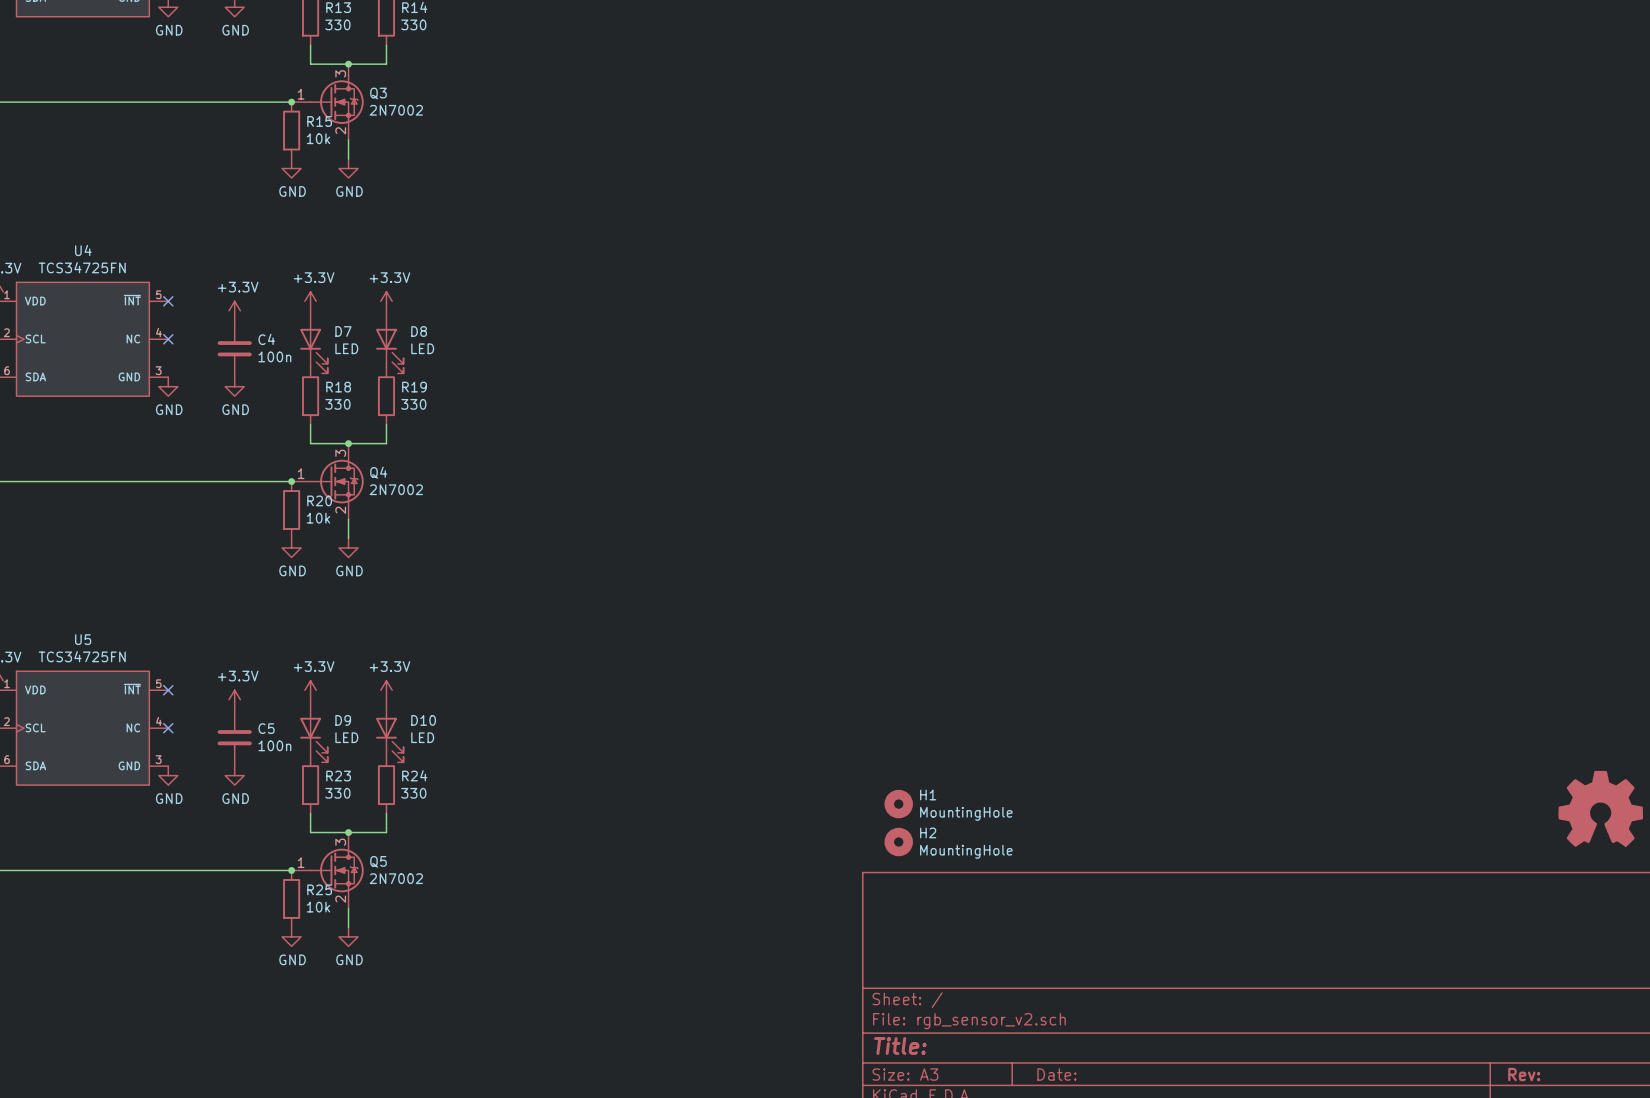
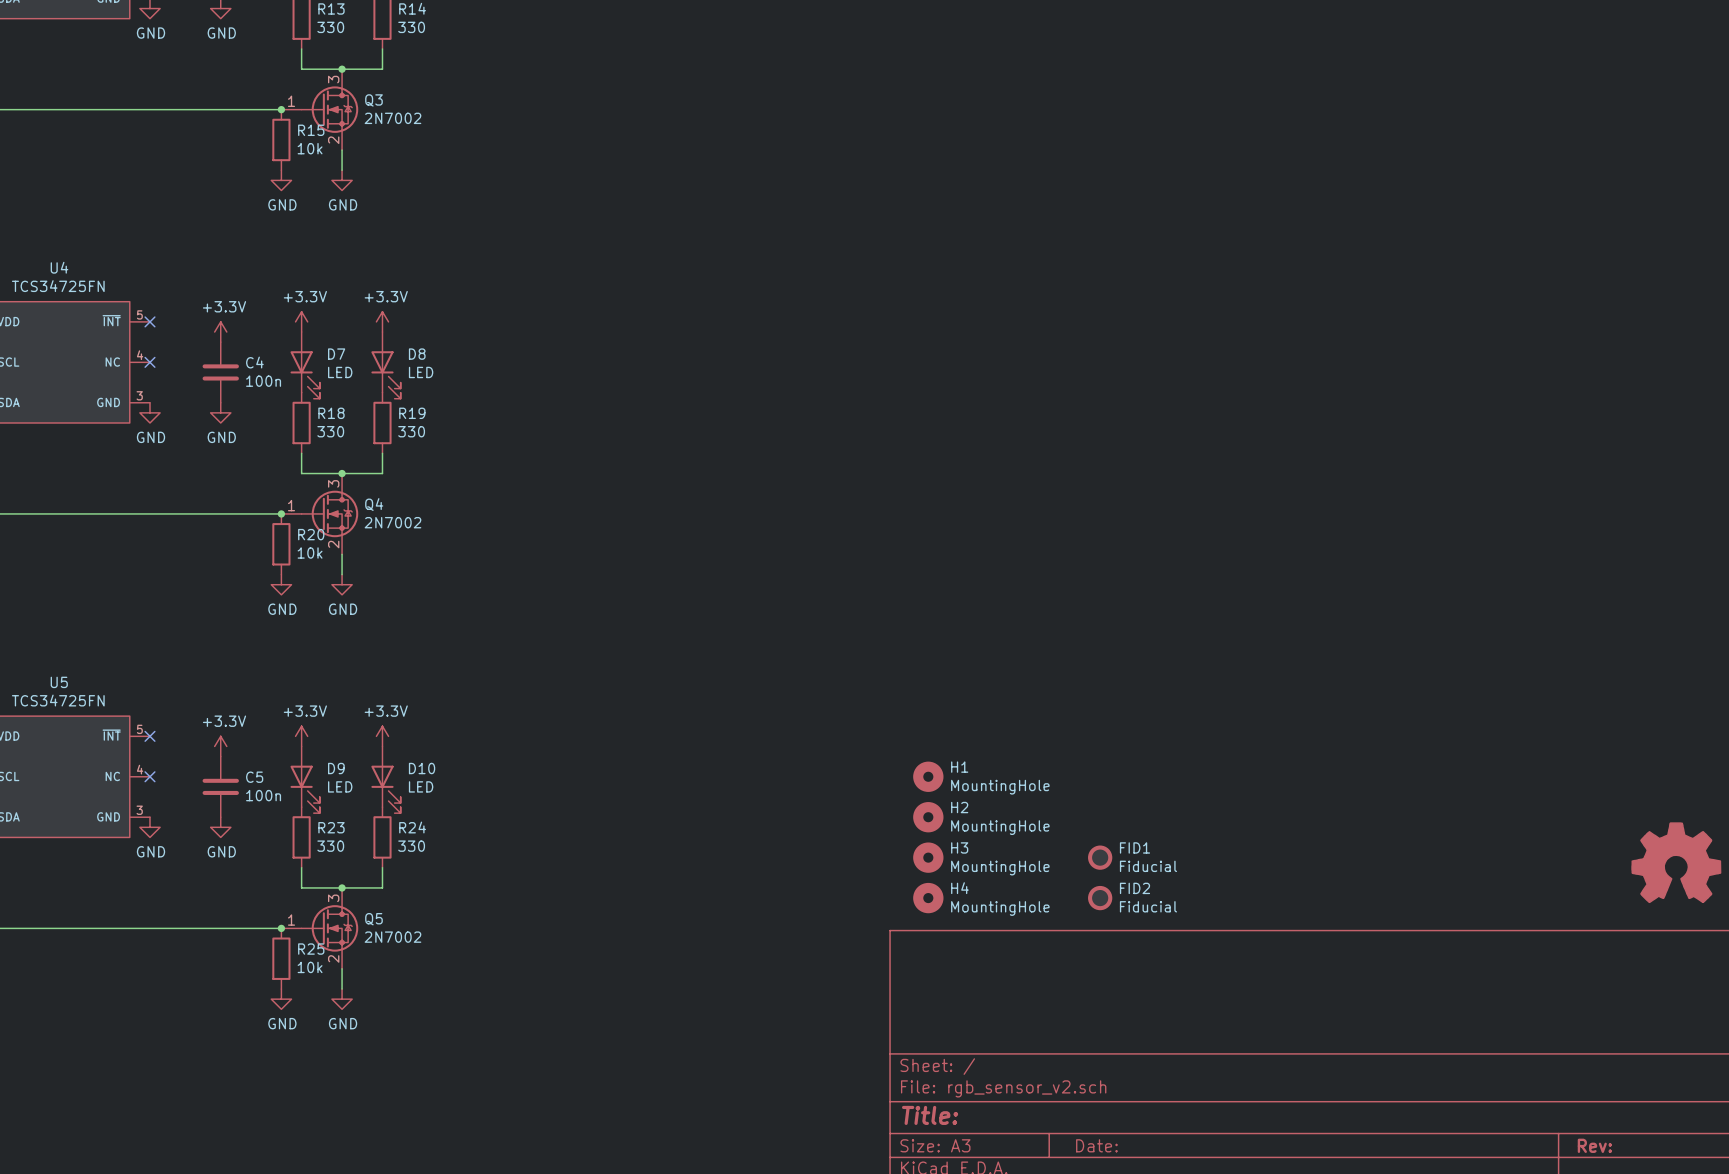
H1: none -> MountingHole (928, 776)
H2: none -> MountingHole (928, 817)
H1 name: H1 (928, 795) -> H3 (959, 847)
FID1: none -> Fiducial (1100, 857)
H2 name: H2 (928, 832) -> H4 (959, 888)
FID2: none -> Fiducial (1100, 898)

